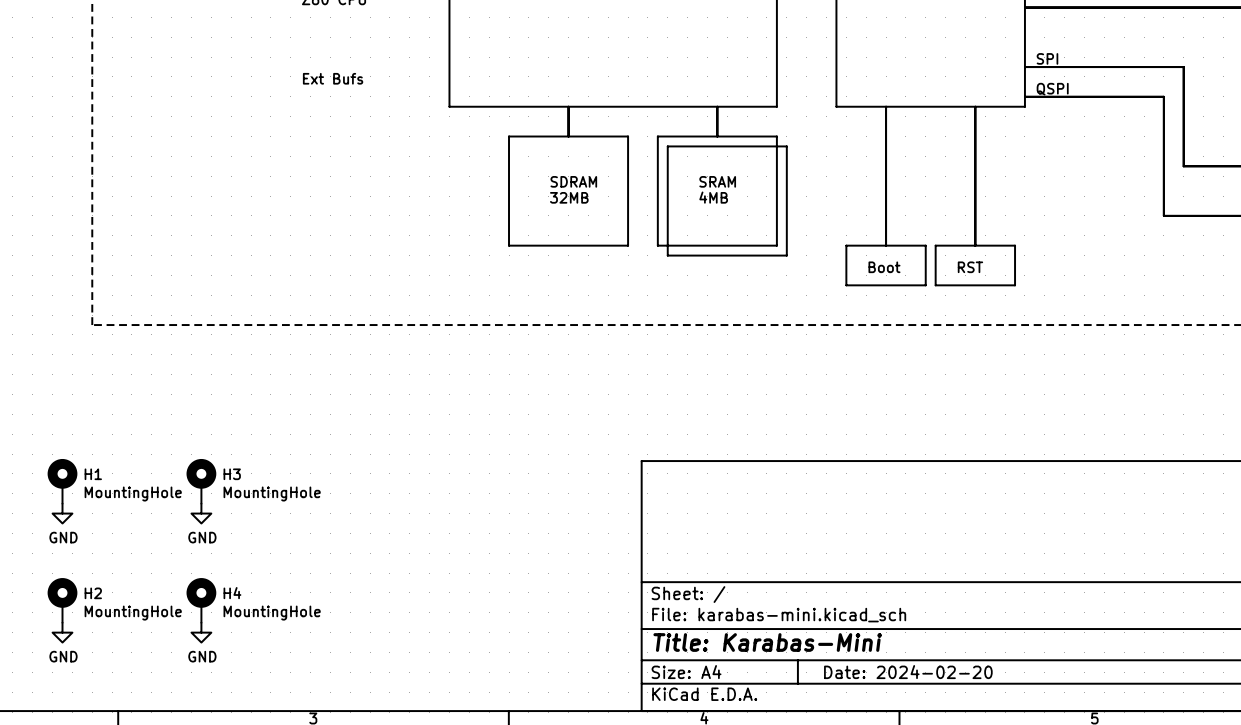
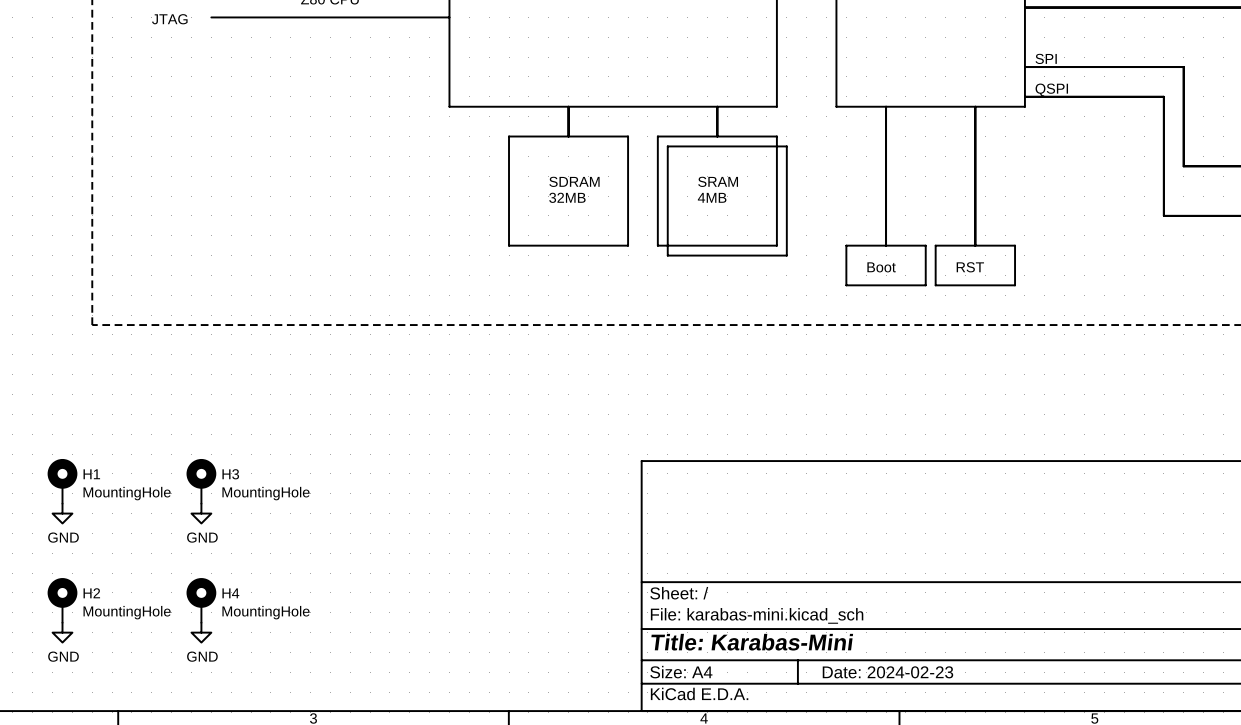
line: none -> (211, 17) (449, 17)
text: none -> JTAG (169, 19)
text: Ext Bufs (333, 78) -> none
title block: Date: 2024-02-20 (908, 672) -> Date: 2024-02-23 (887, 672)

